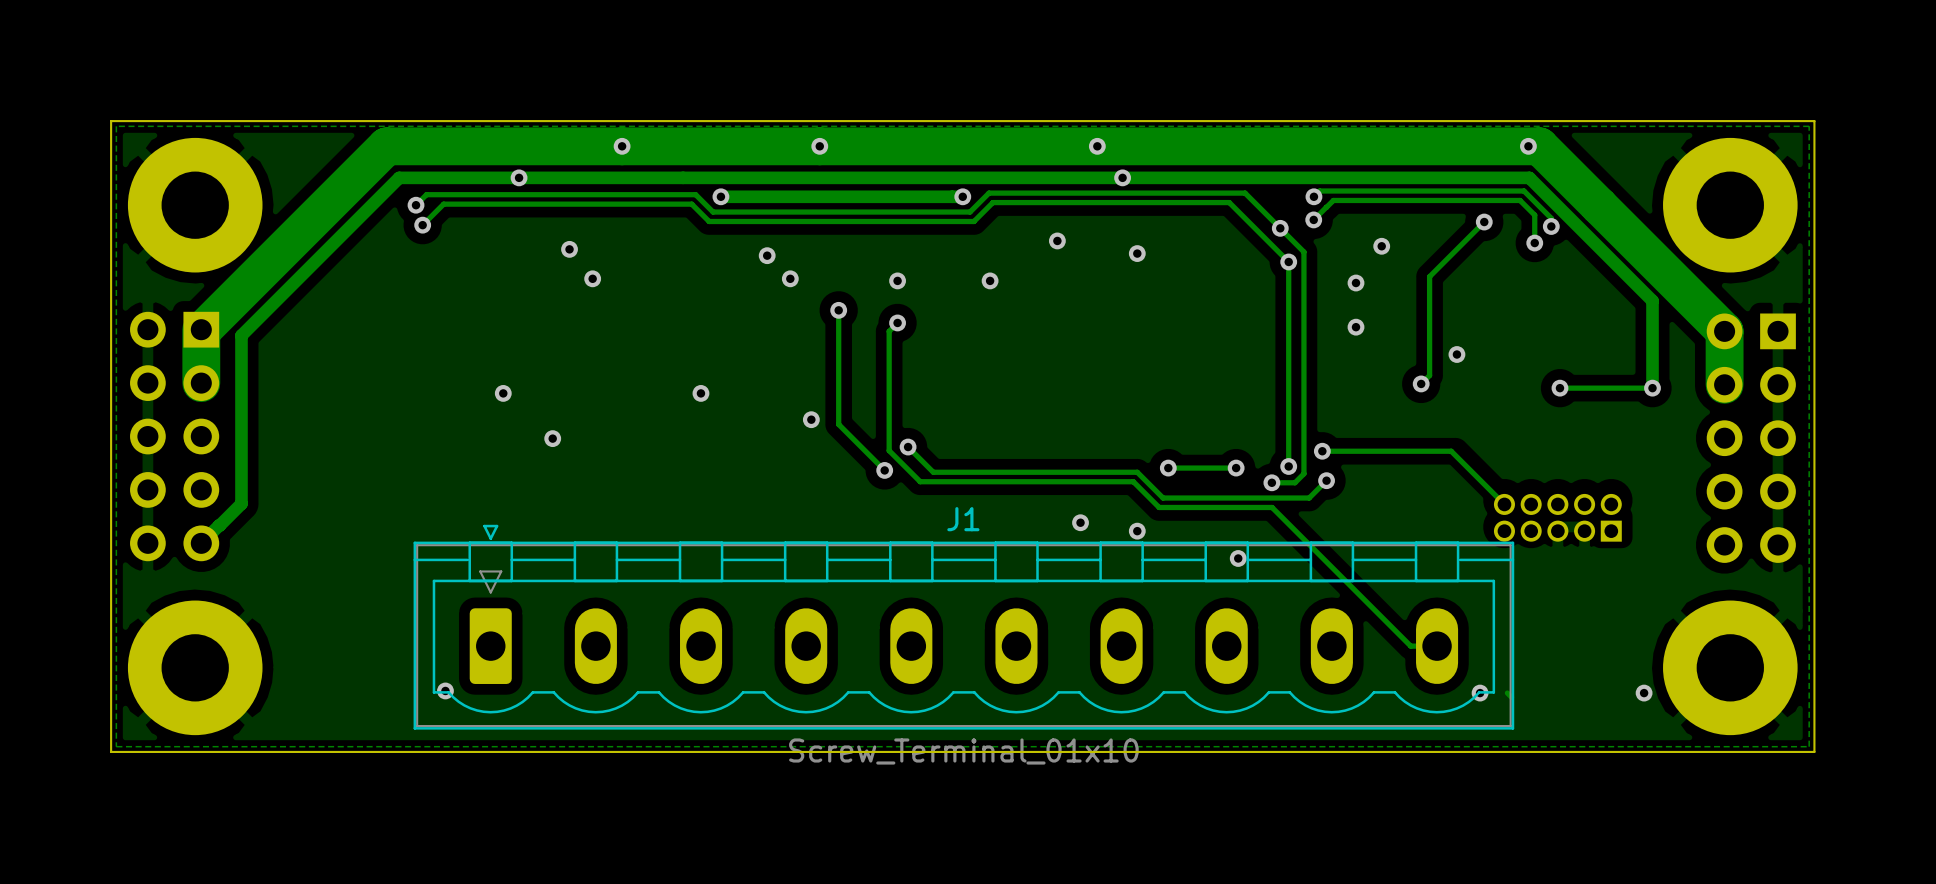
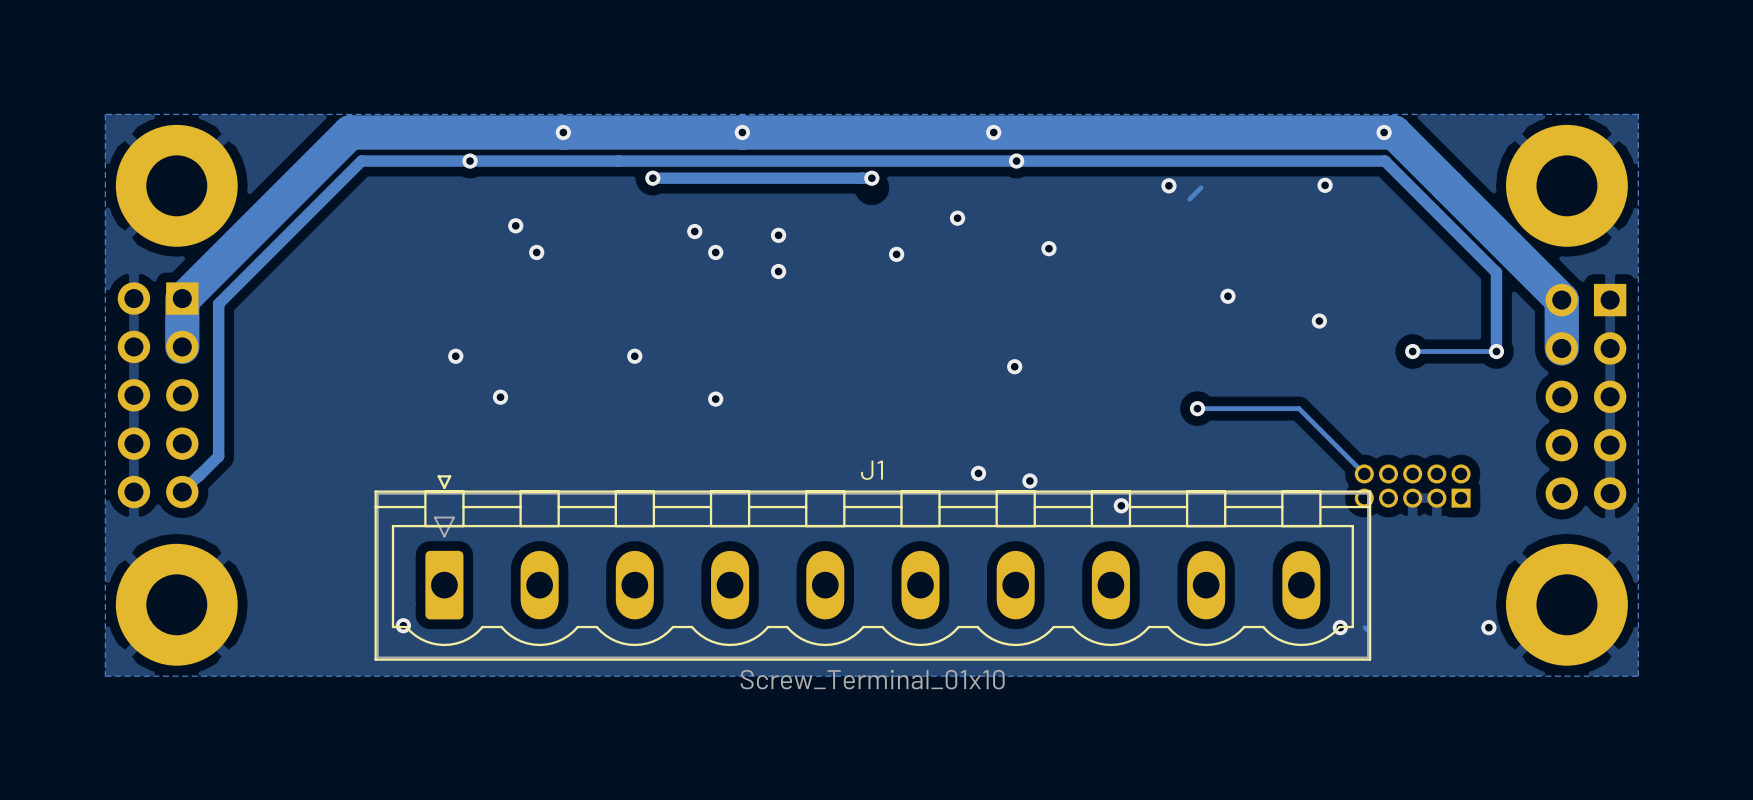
board edge: (1814, 121) (111, 121) (111, 751) (1814, 751) (1814, 121) -> none
track: (1313, 196) (1319, 191) (1524, 191) (1551, 218) (1551, 226) -> none
via: (1313, 196) -> none
track: (416, 205) (426, 194) (695, 194) (713, 212) (970, 212) (989, 193) (1245, 193) (1303, 251) (1303, 473) (1294, 482) (1271, 482) -> none
via: (416, 205) -> none
via: none -> (1168, 185)
track: (1326, 207) (1333, 200) (1520, 200) (1534, 215) (1534, 243) -> none
via: (1313, 219) -> none
track: (1484, 222) (1429, 276) (1429, 375) (1421, 383) -> none
via position: (1484, 222) -> (1325, 185)
track: (422, 225) (443, 204) (691, 204) (709, 221) (974, 221) (992, 202) (1229, 202) (1288, 261) (1288, 466) -> none
via: (422, 225) -> none
via: (1551, 226) -> none
via: (1280, 228) -> none
via: (1534, 243) -> none
via: (1381, 246) -> none
via position: (1137, 253) -> (1048, 248)
via: none -> (778, 235)
via: (1288, 261) -> none
via: (897, 280) -> none
via: (1356, 283) -> none
via: none -> (778, 271)
track: (838, 310) (838, 424) (884, 470) -> none
via: (838, 310) -> none
track: (897, 322) (889, 331) (889, 450) (920, 481) (1133, 481) (1159, 507) (1272, 507) (1410, 646) (1437, 646) -> none
via: (897, 322) -> none
via: (1421, 383) -> none
via: none -> (1014, 366)
via position: (811, 419) -> (715, 399)
track: (908, 447) (933, 472) (1137, 472) (1163, 498) (1309, 498) (1326, 480) -> none
via: (908, 447) -> none
track: (1434, 451) (1451, 451) (1504, 504) -> (1299, 408) (1364, 473)
via: (1288, 466) -> none
via: (1168, 468) -> none
track: (1236, 468) (1168, 468) -> none
via: (1236, 468) -> none
via: (884, 470) -> none
via: (1326, 480) -> none
via: (1271, 482) -> none
part position: (1557, 517) -> (1412, 486)

